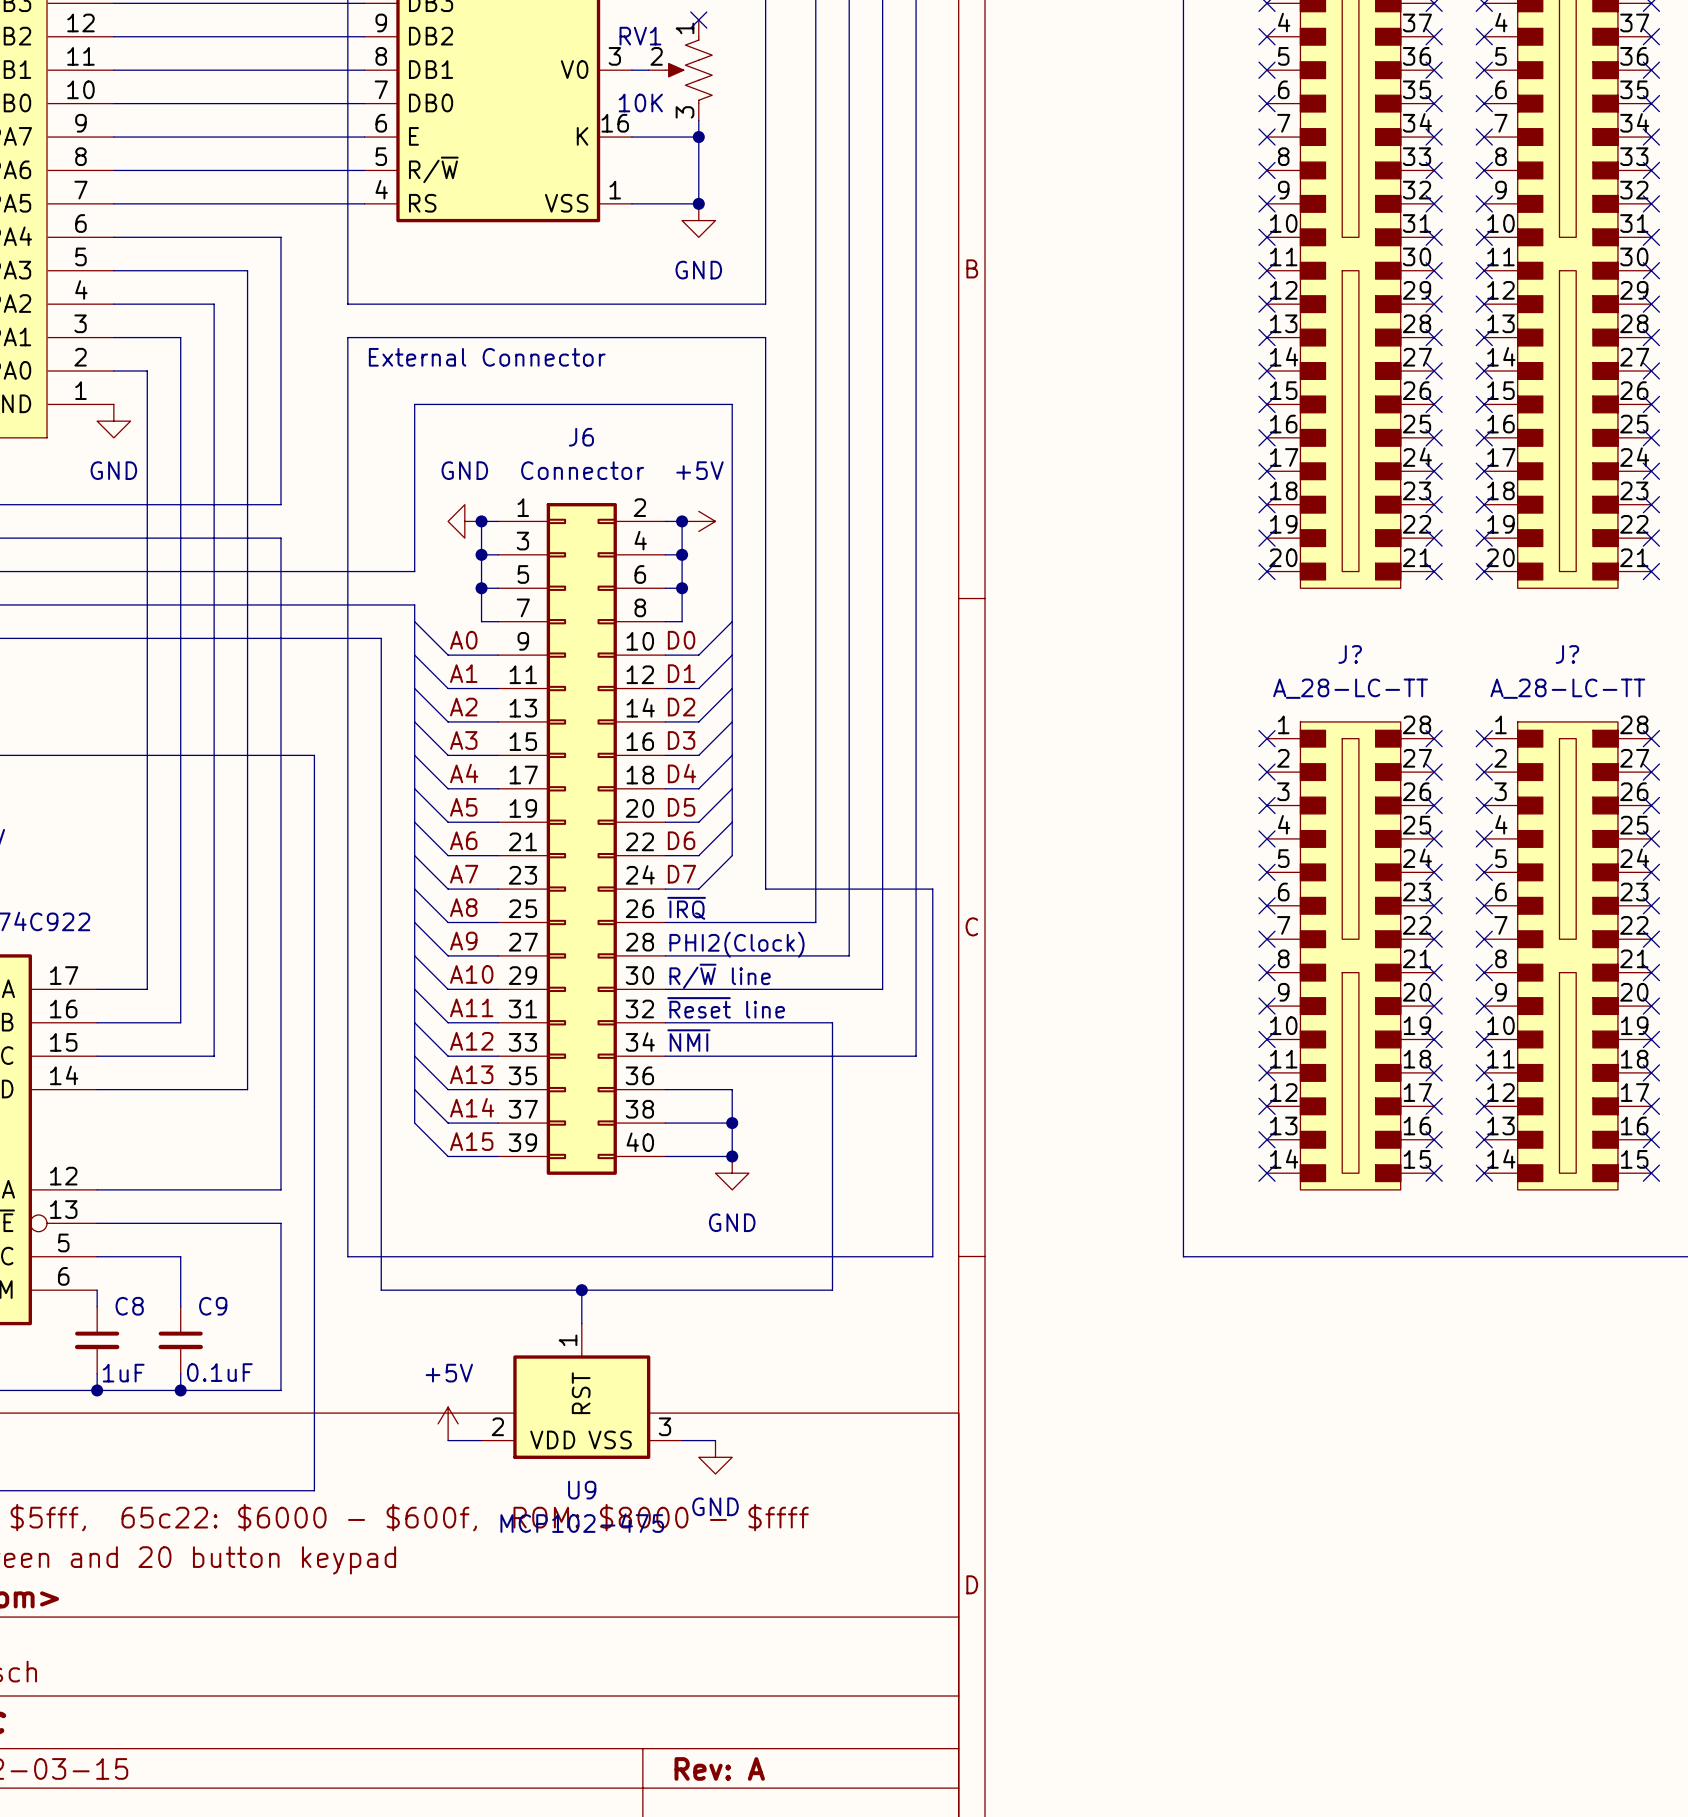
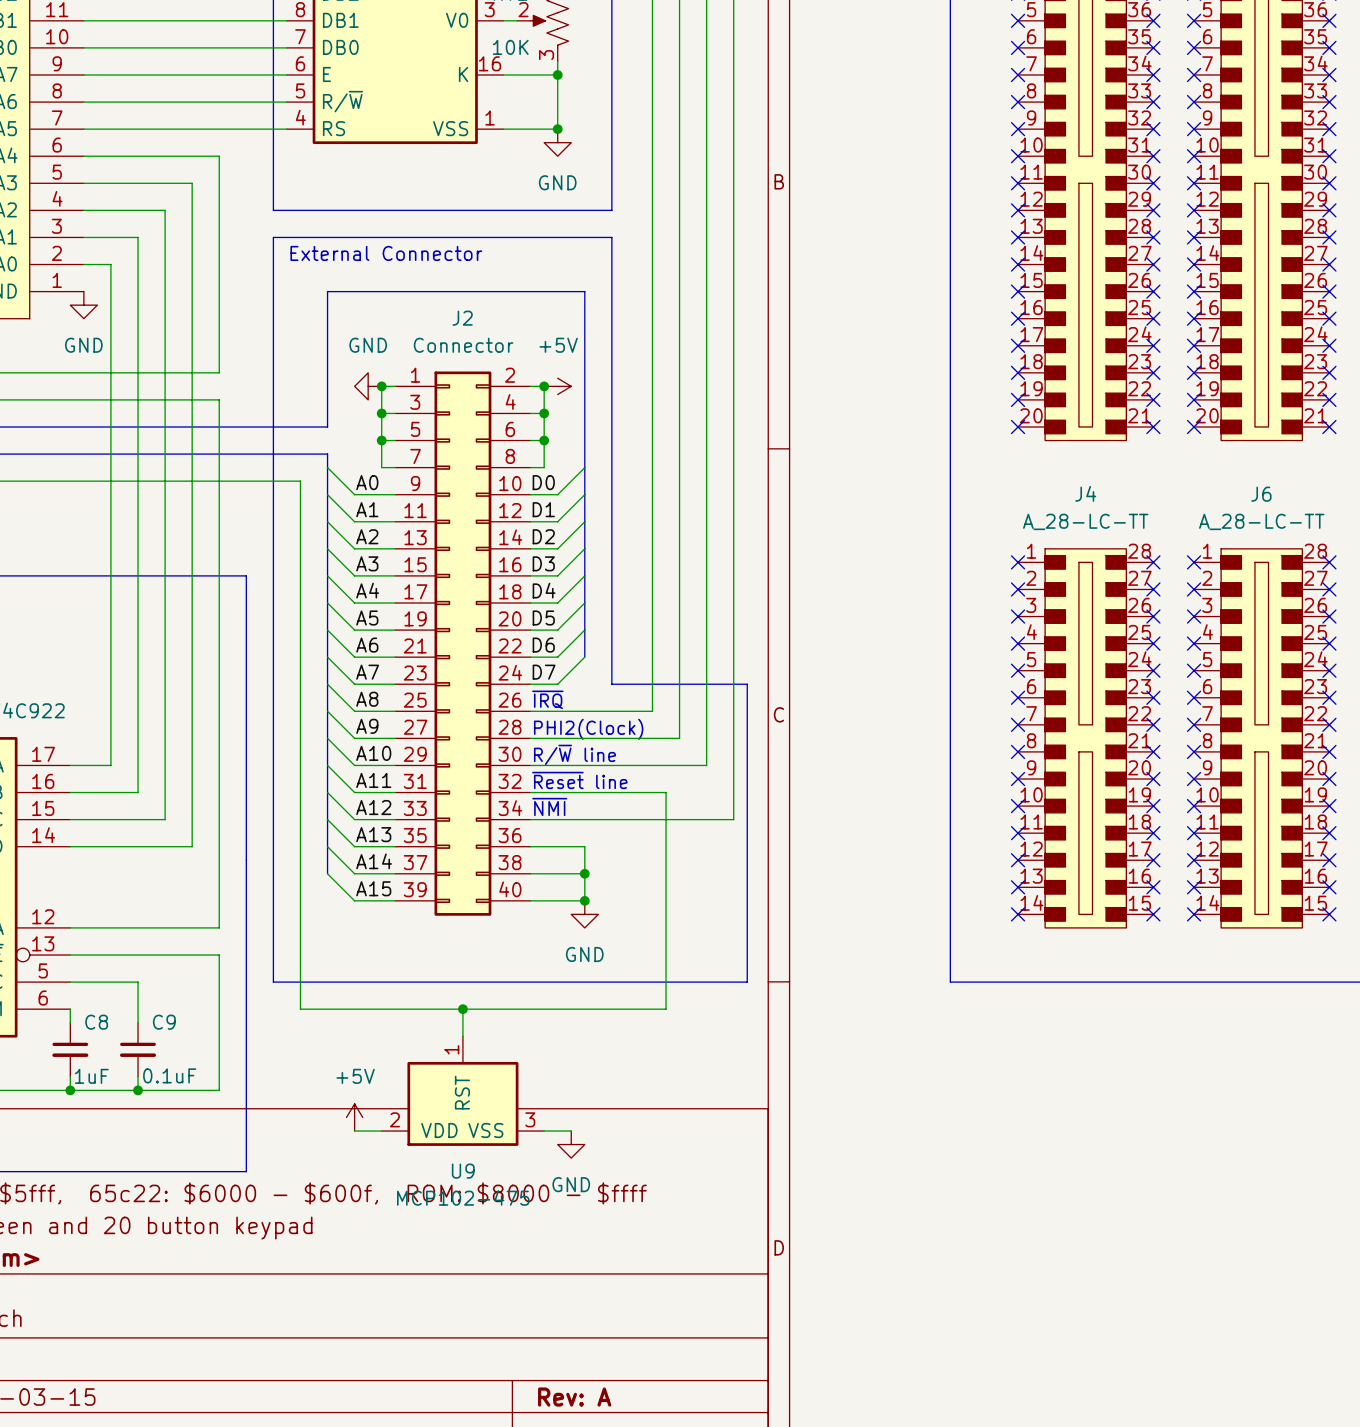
J6 name: J6 (581, 437) -> J2 (462, 318)
J? name: J? (1350, 654) -> J4 (1085, 493)
J? name: J? (1567, 654) -> J6 (1261, 494)

